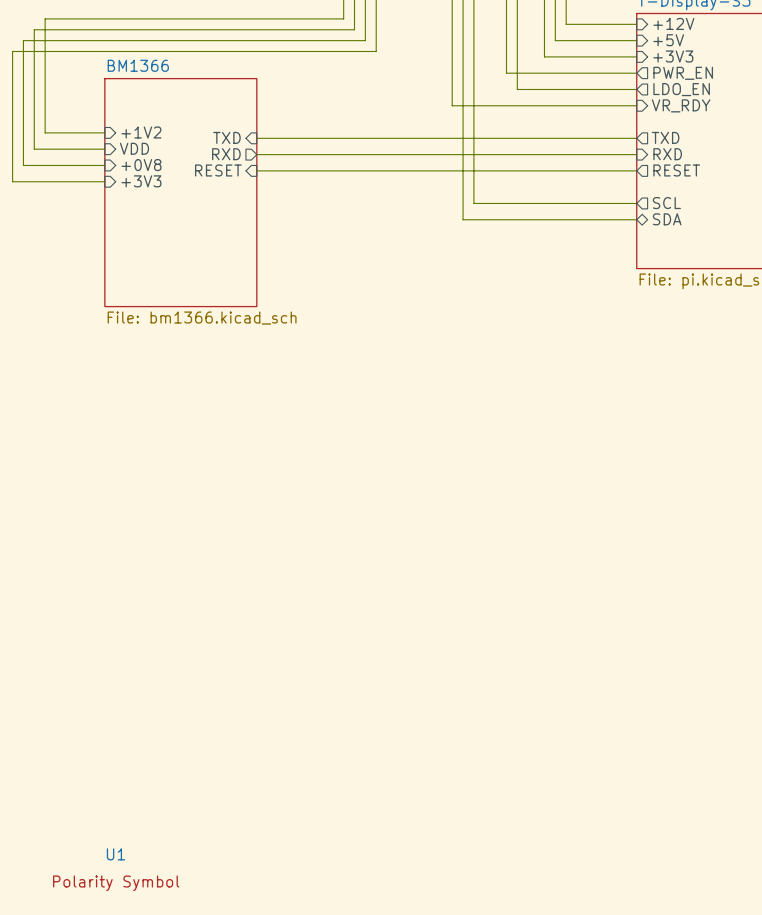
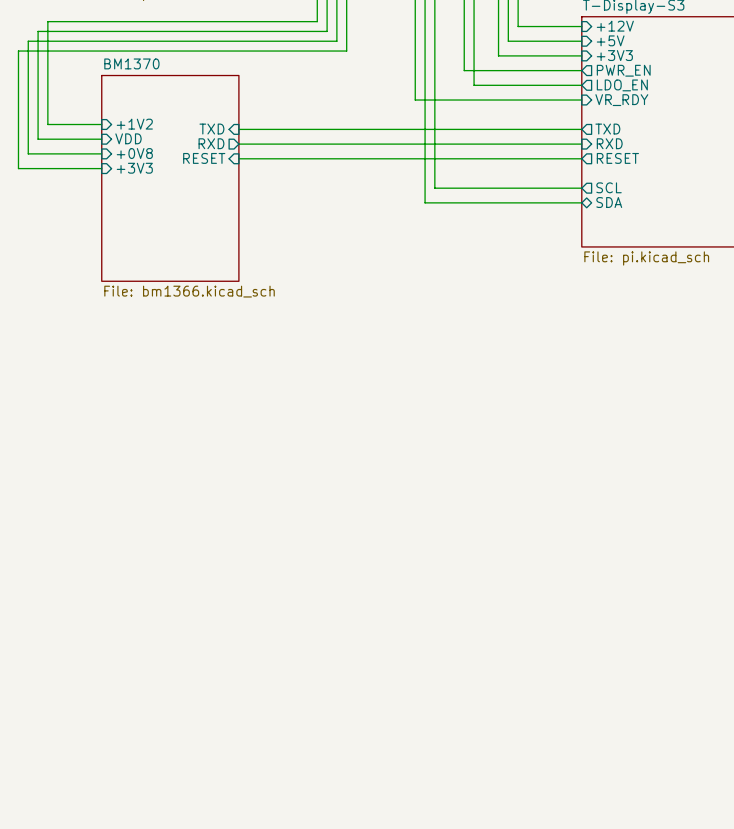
sheet BM1366 name: BM1366 (138, 65) -> BM1370 (131, 63)
U1: (116, 869) -> none

